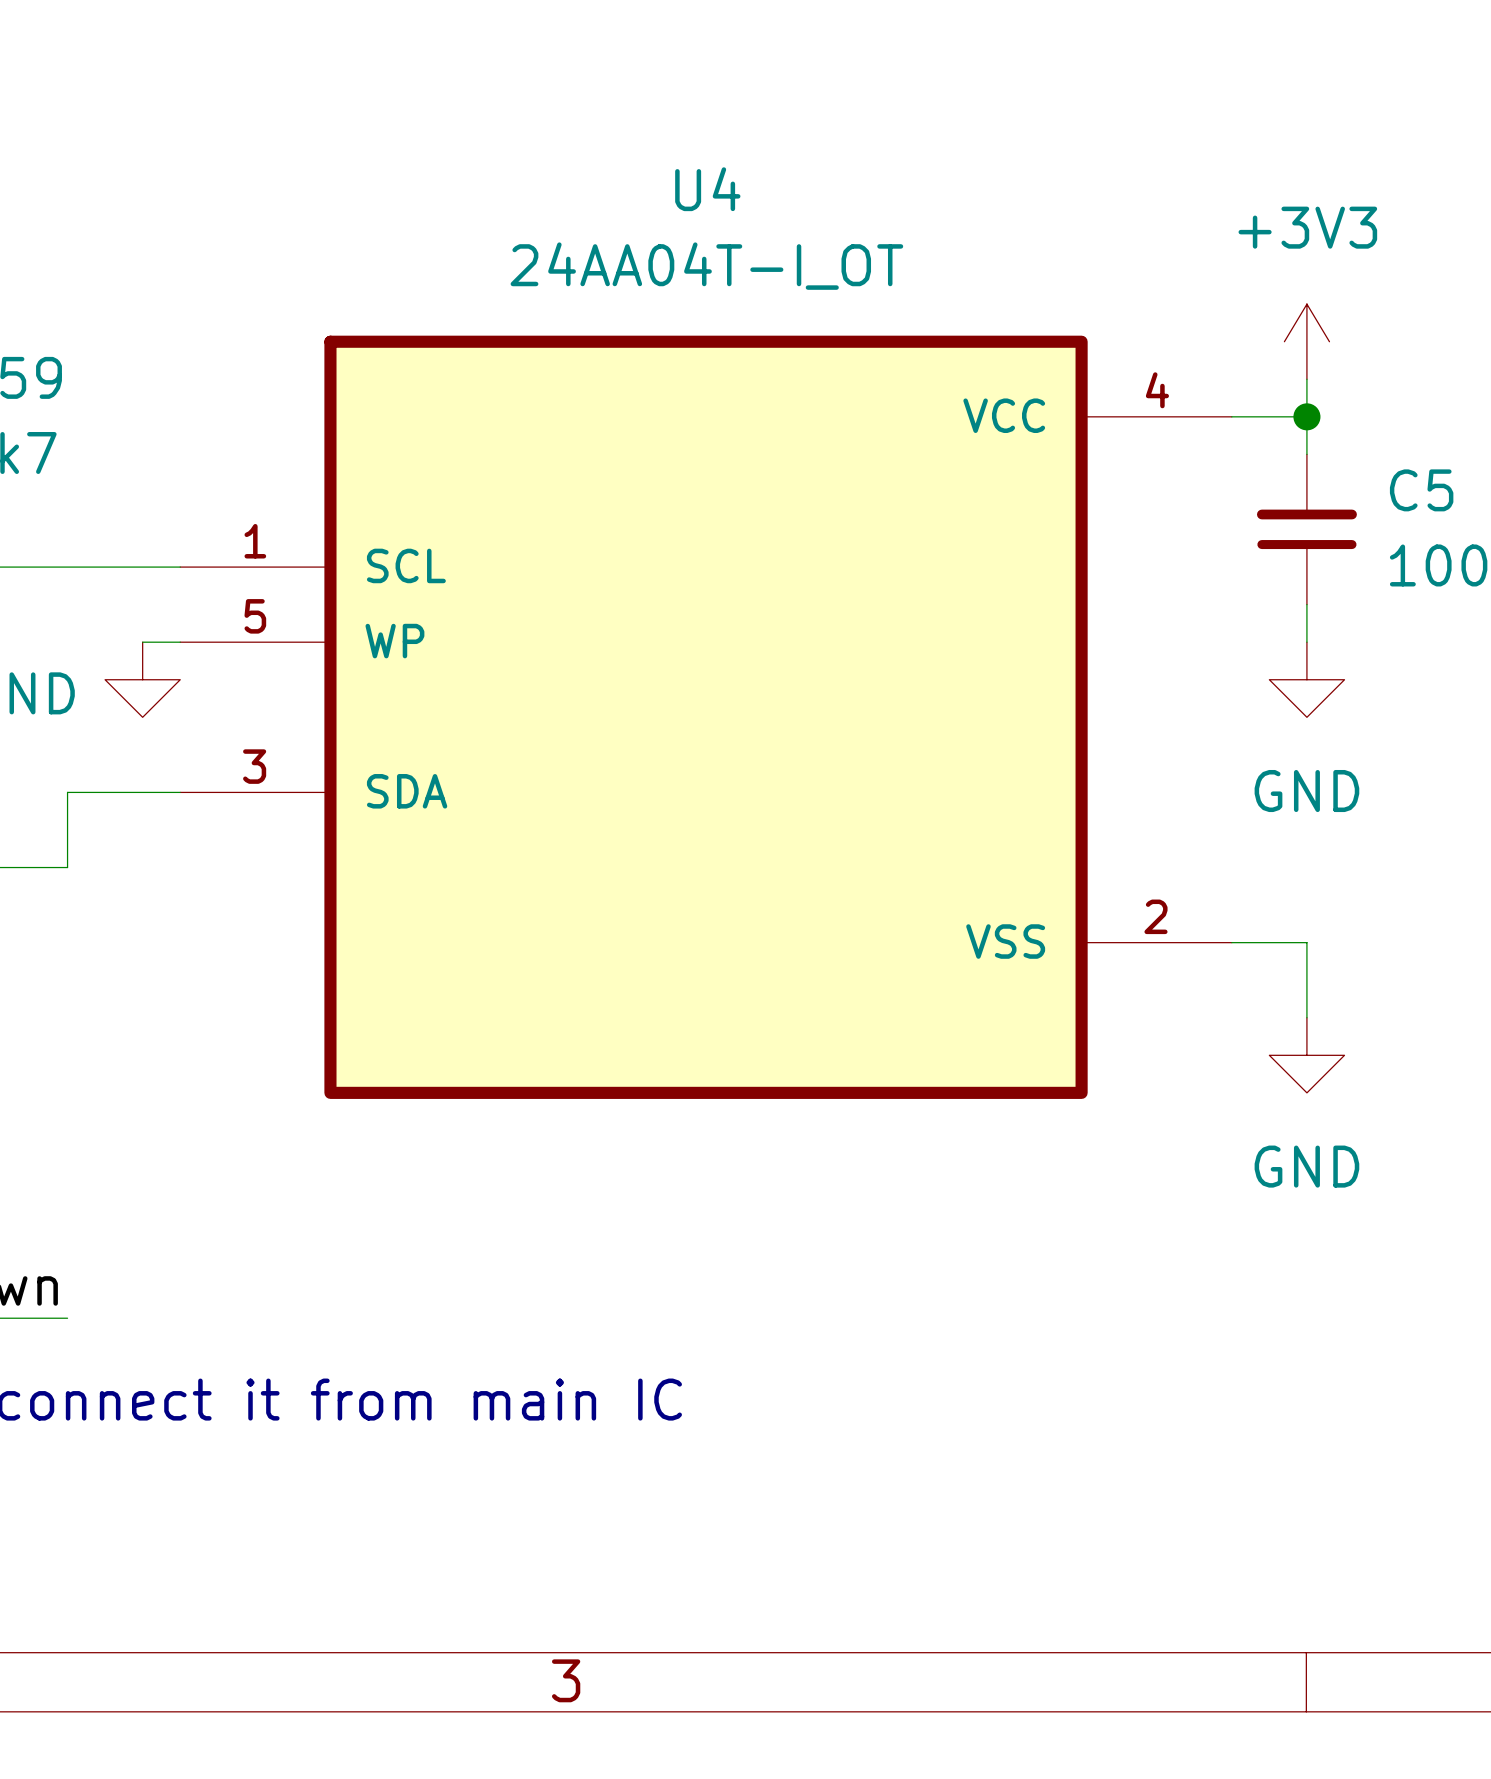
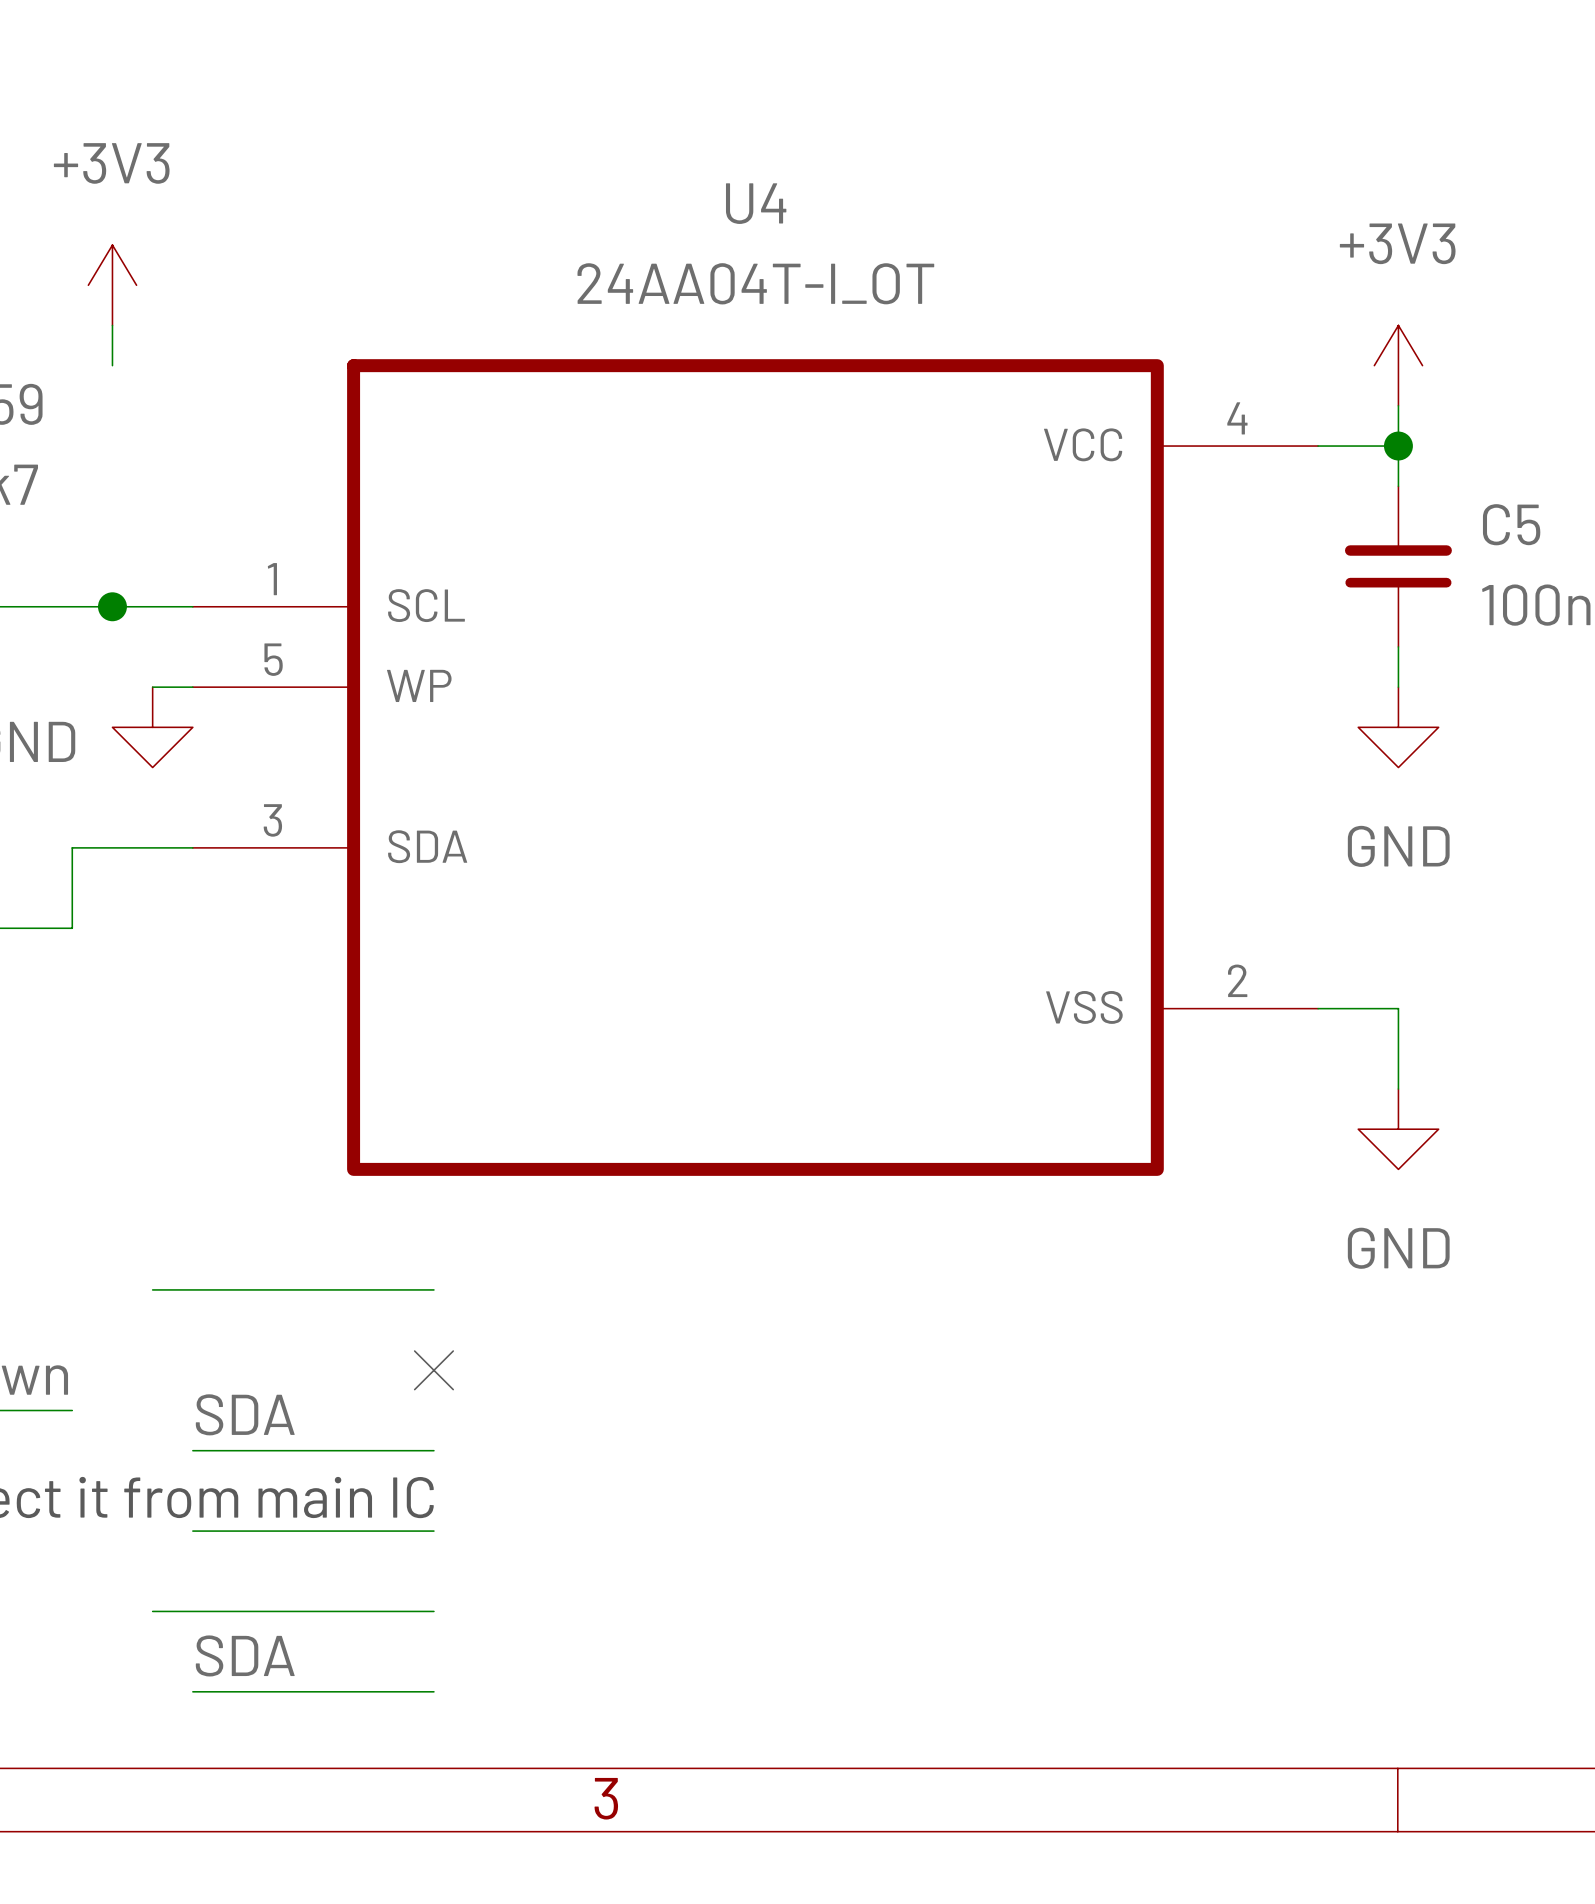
power symbol: none -> +3V3 (112, 285)
wire: none -> (112, 325) (112, 365)
junction: none -> (112, 606)
wire: none -> (152, 1289) (433, 1289)
no-connect mark: none -> (433, 1370)
label: none -> SDA (245, 1414)
wire: none -> (192, 1450) (433, 1450)
wire: none -> (192, 1531) (433, 1531)
wire: none -> (152, 1611) (433, 1611)
label: none -> SDA (245, 1655)
wire: none -> (192, 1691) (433, 1691)

